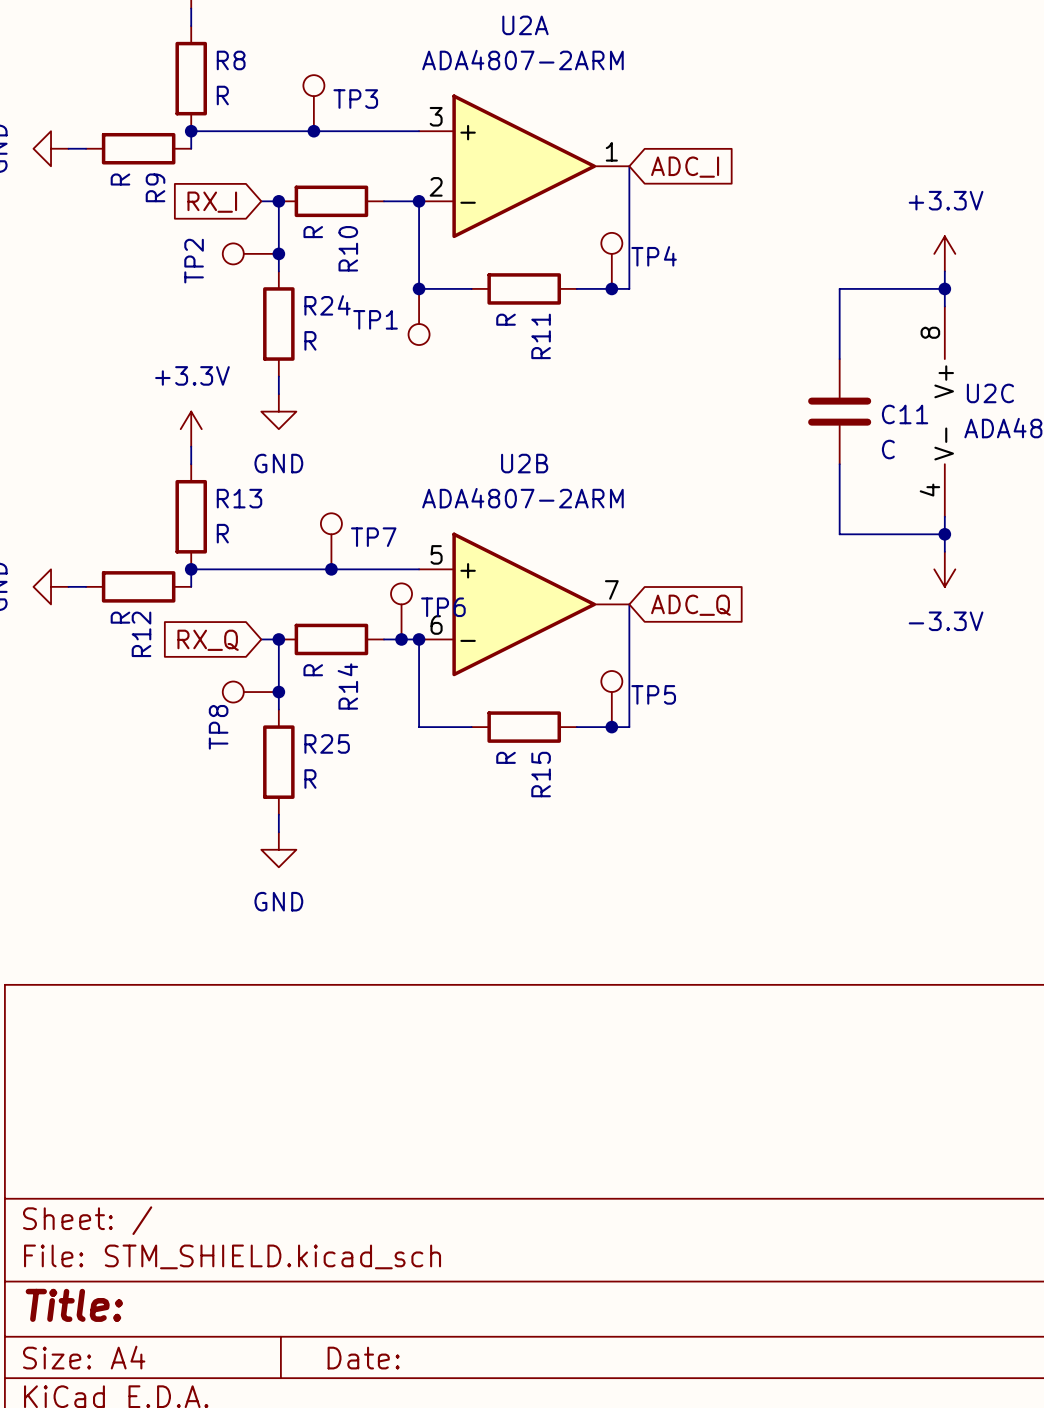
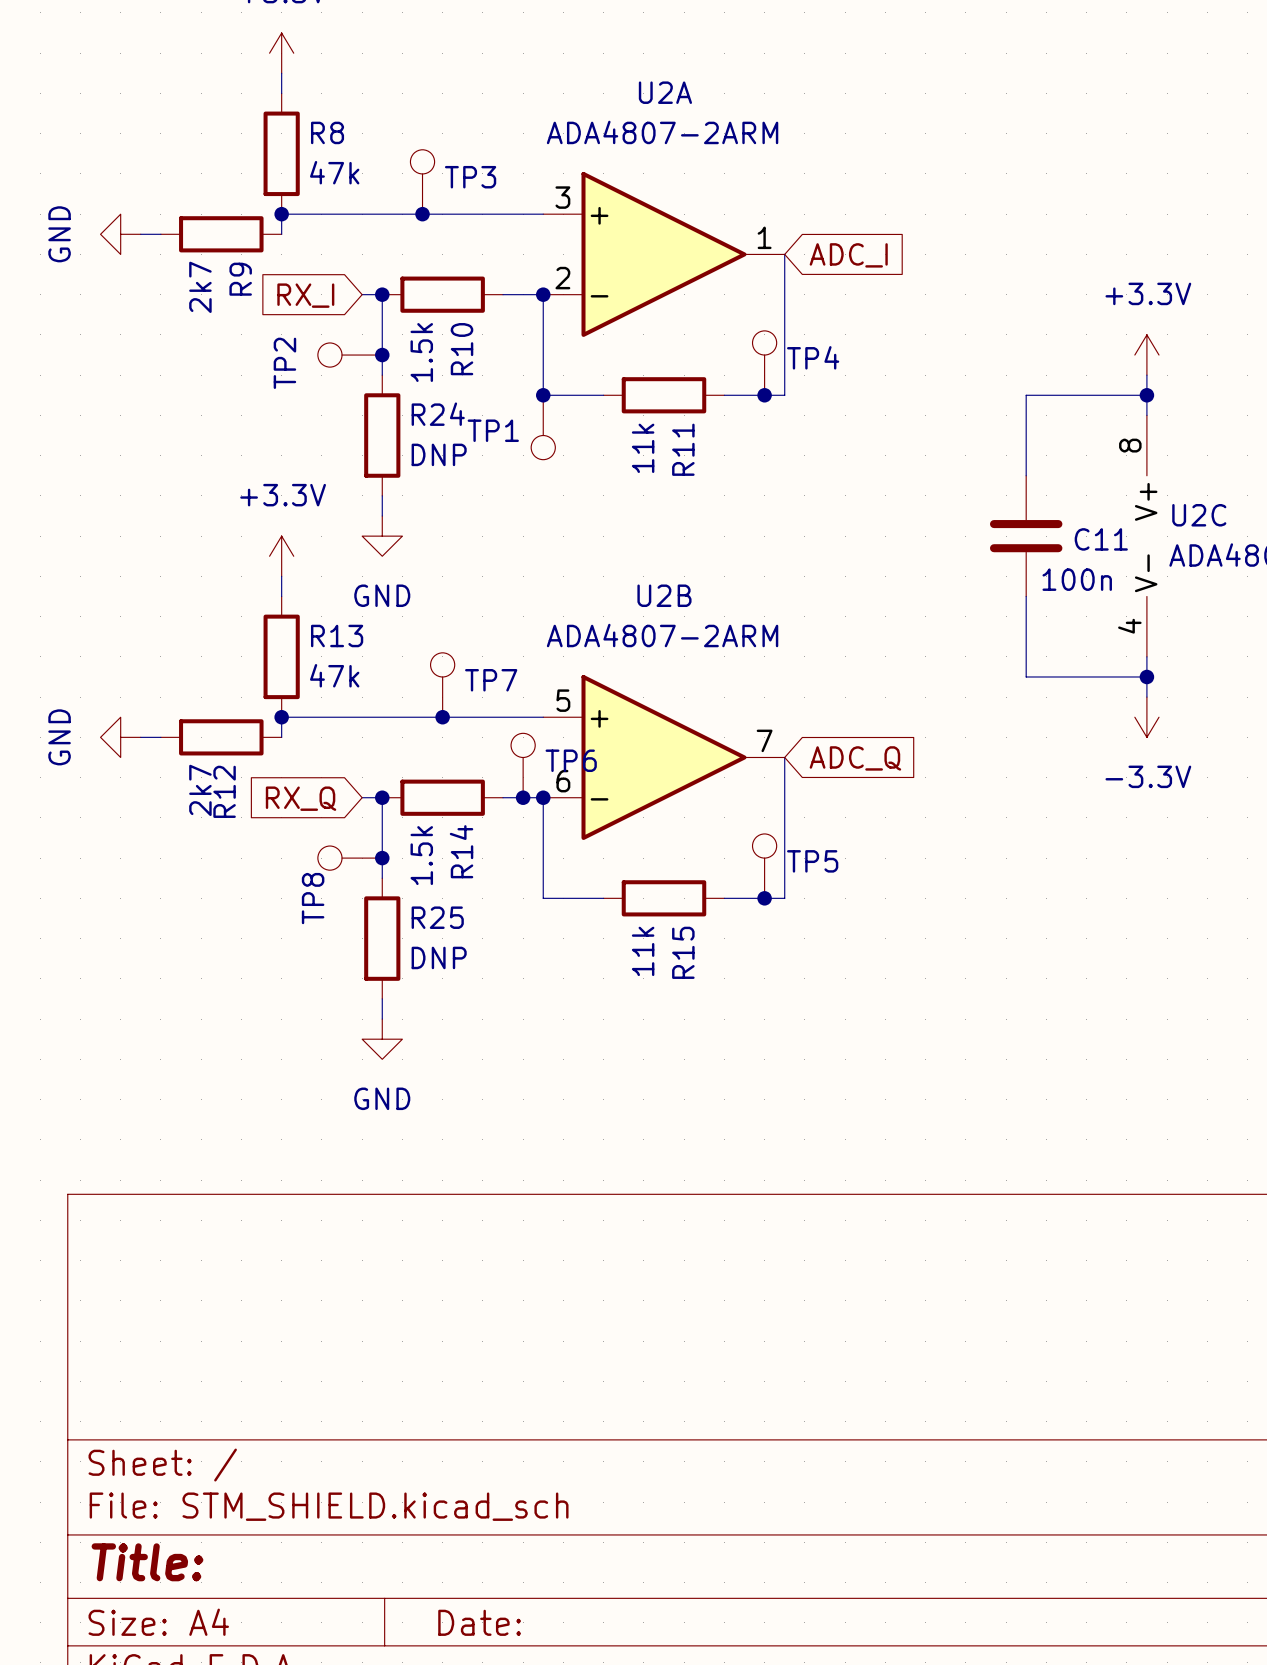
R8 value: R (222, 95) -> 47k (334, 172)
R9 value: R (120, 179) -> 2k7 (200, 287)
R10 value: R (313, 232) -> 1.5k (421, 352)
R11 value: R (506, 319) -> 11k (643, 448)
R24 value: R (310, 340) -> DNP (439, 454)
C11 value: C (888, 449) -> 100n (1077, 579)
R13 value: R (222, 533) -> 47k (334, 675)
R12 value: R (120, 617) -> 2k7 (200, 790)
R14 value: R (313, 670) -> 1.5k (421, 855)
R15 value: R (506, 757) -> 11k (643, 951)
R25 value: R (310, 779) -> DNP (439, 957)

